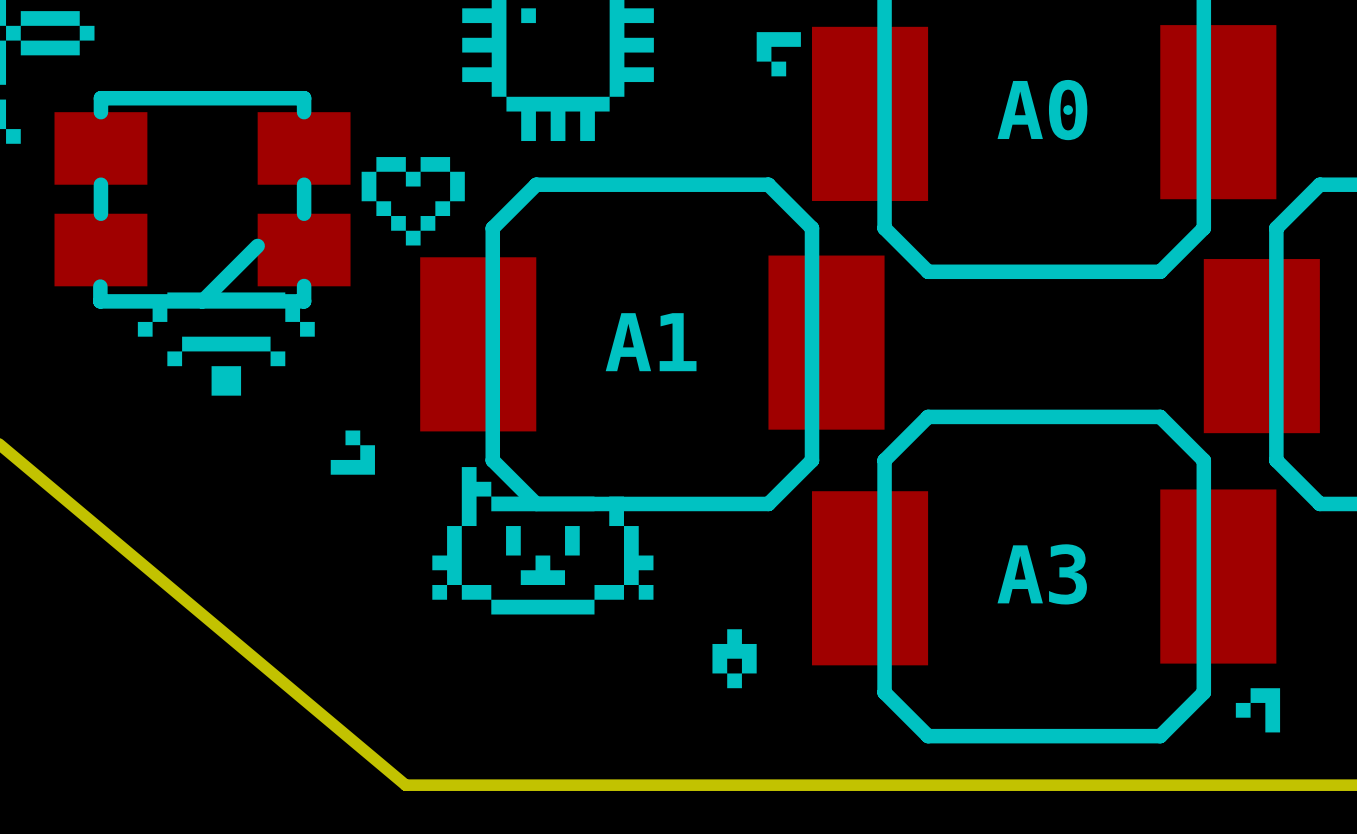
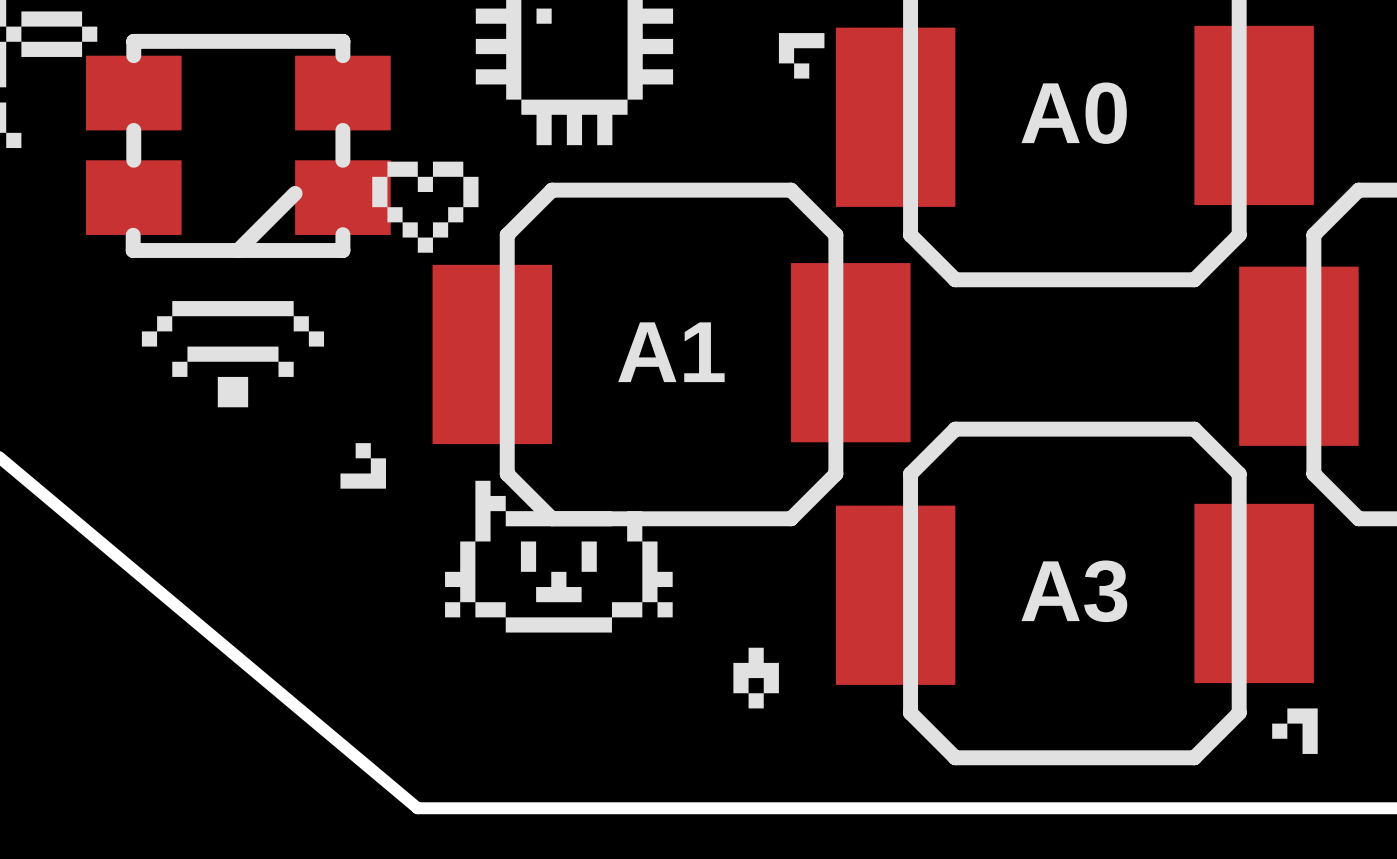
part position: (202, 199) -> (238, 145)

